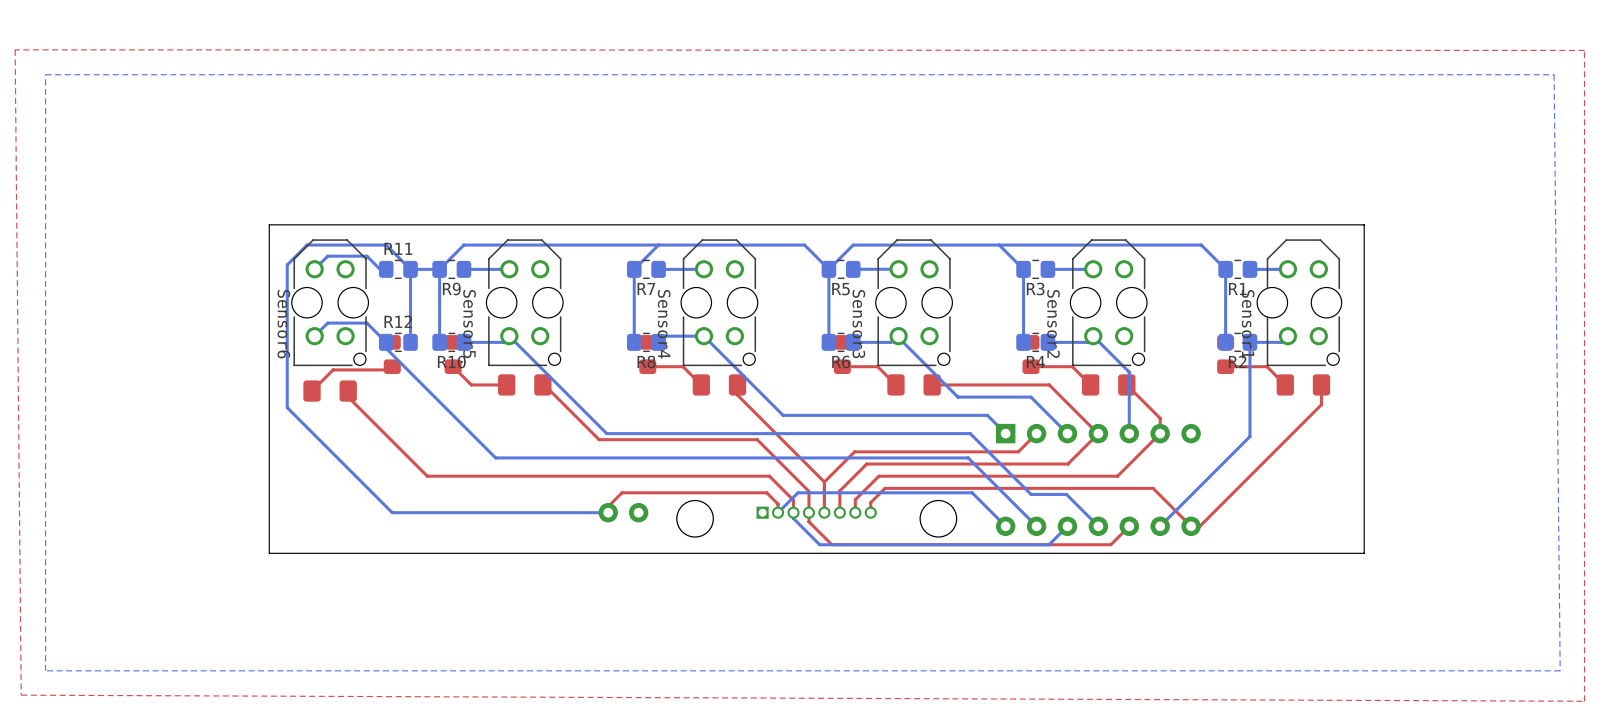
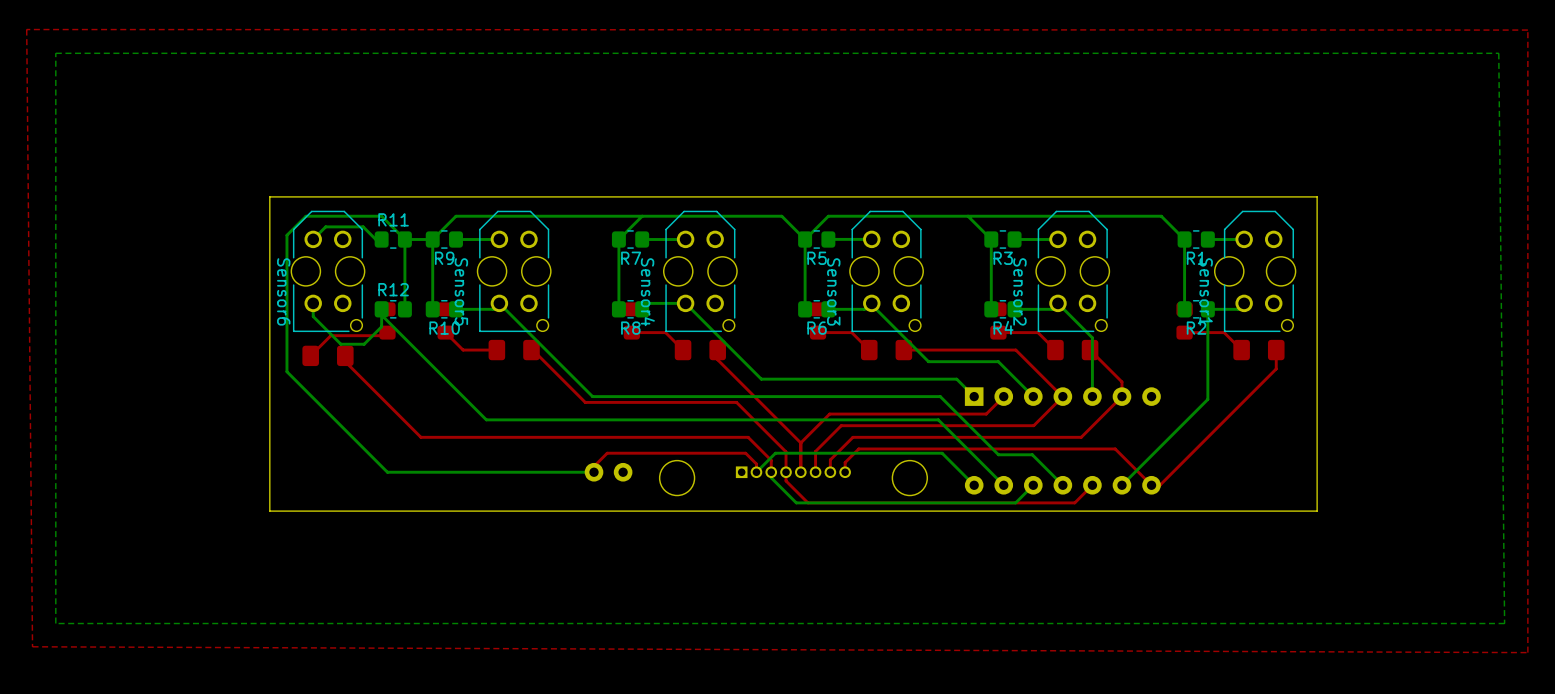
bottom track: (314, 336) (327, 323) (366, 323) (386, 342) -> (313, 303) (313, 316) (340, 344) (364, 344) (381, 326) (381, 315)

